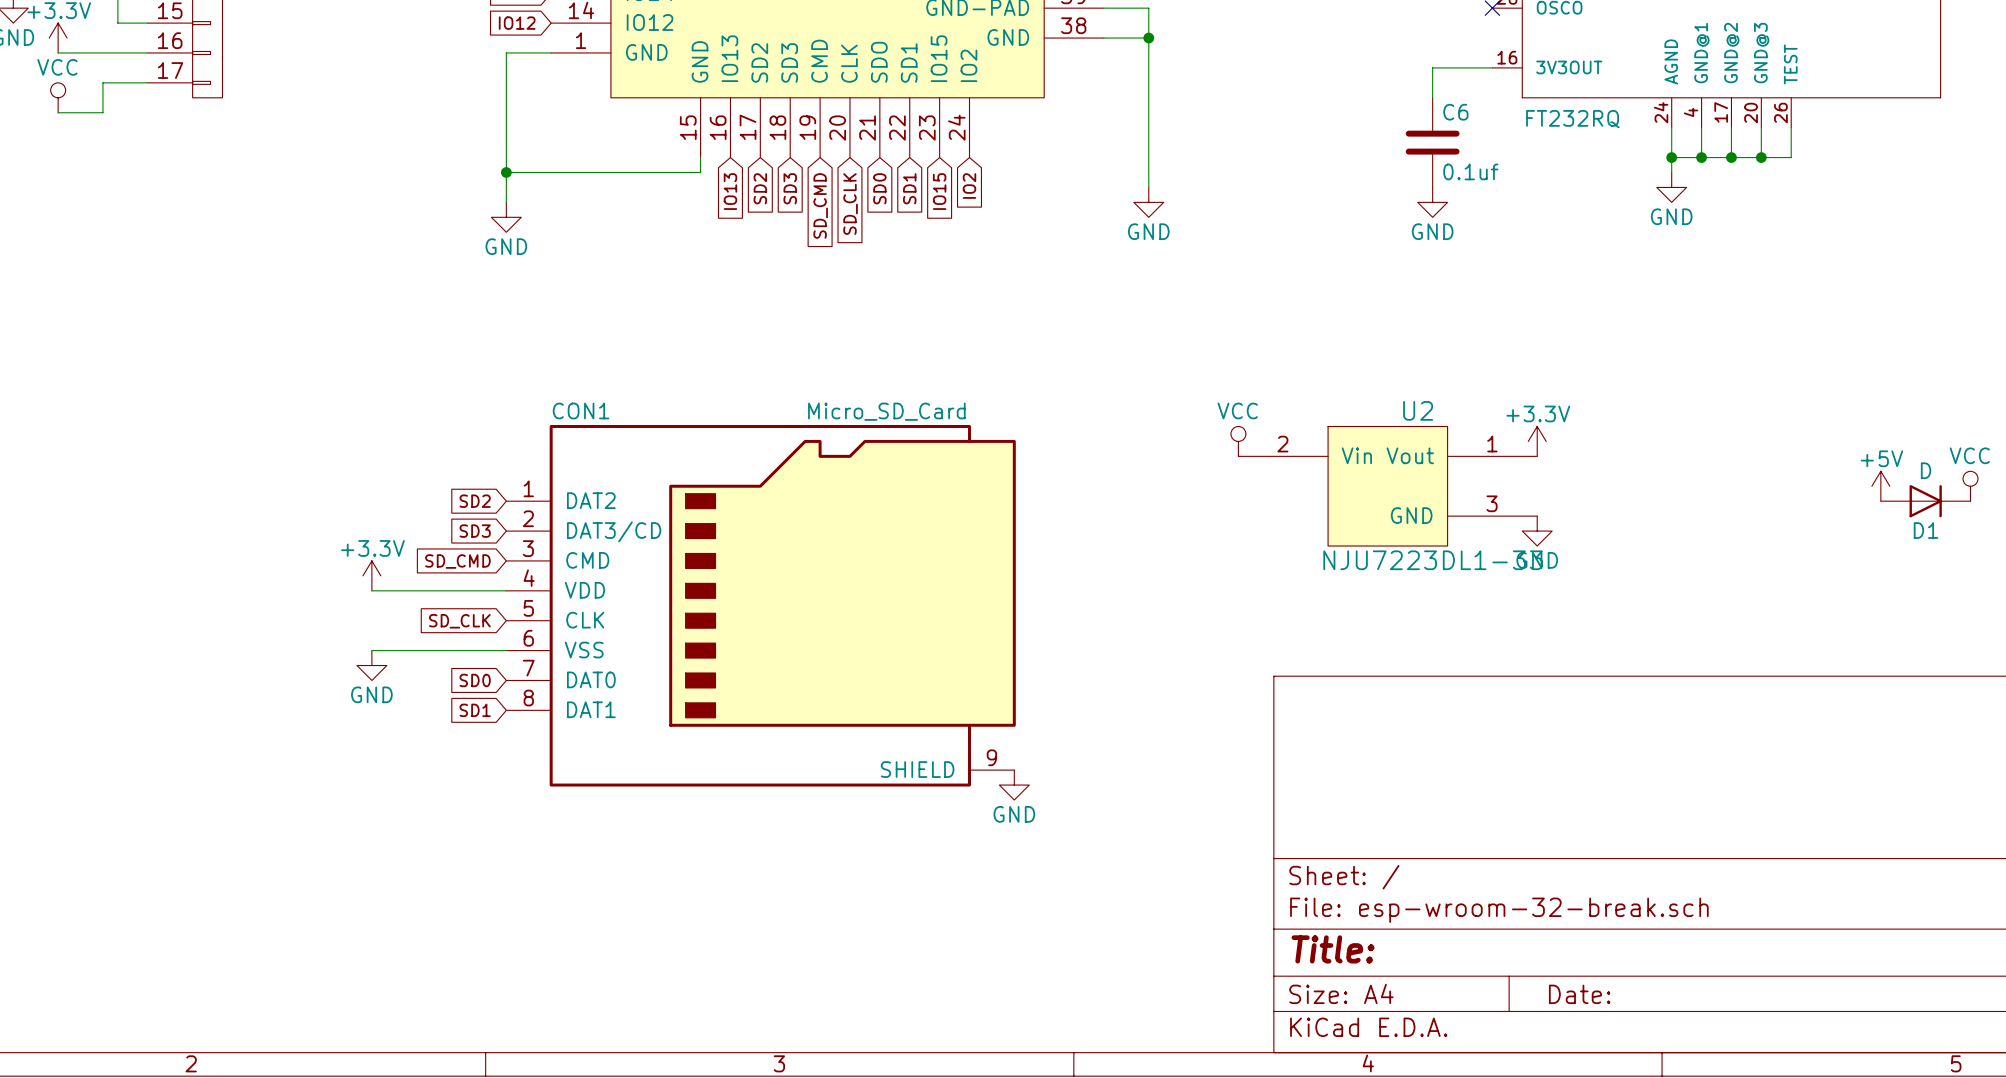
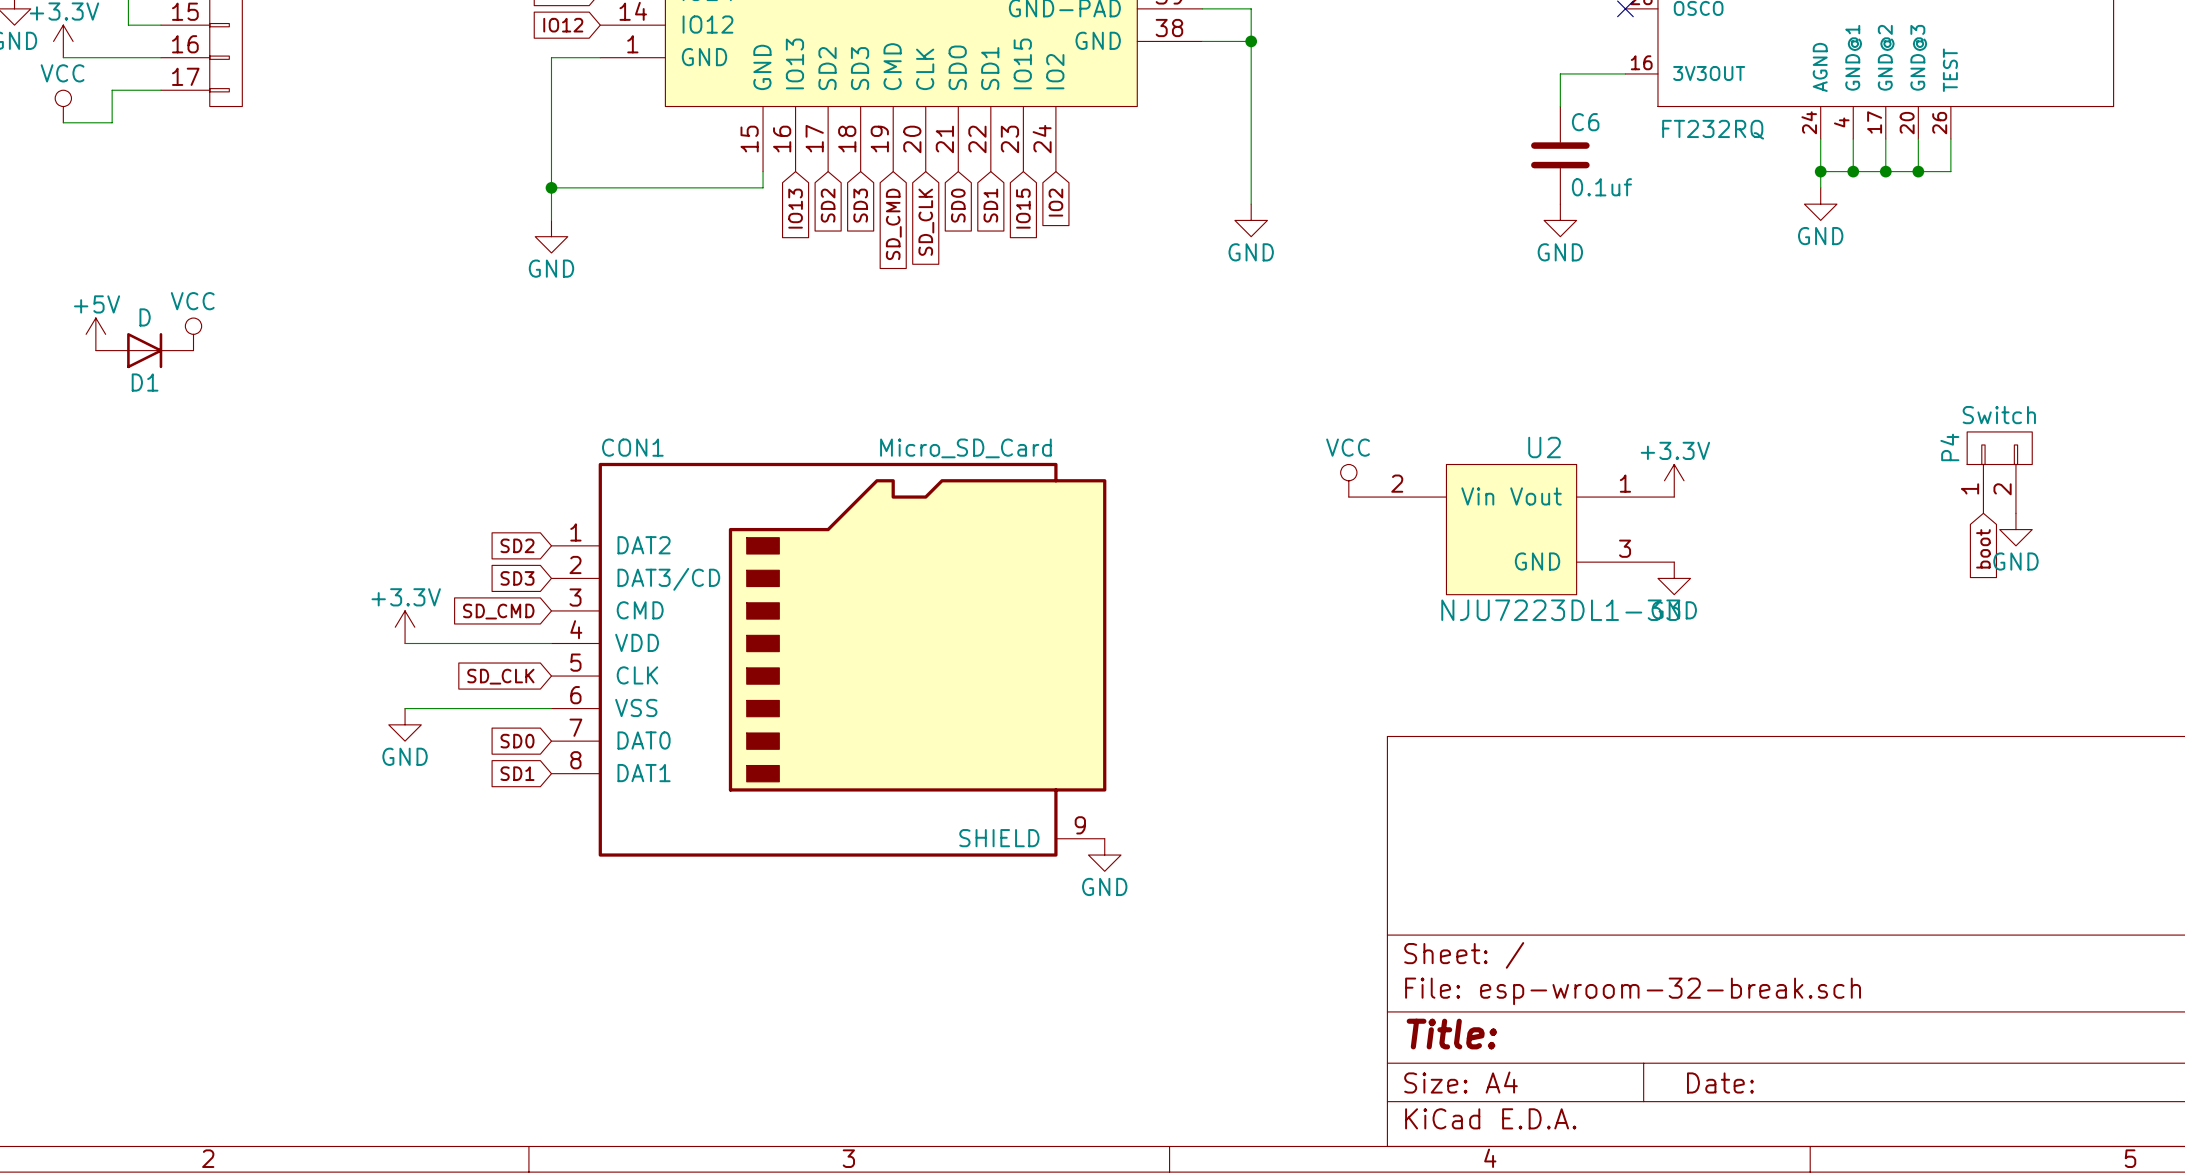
power symbol: none -> +5V (95, 334)
power symbol: none -> VCC (193, 334)
P4: none -> Switch (1999, 472)
power symbol: none -> GND (2015, 529)
power symbol: +5V (1880, 486) -> none
power symbol: VCC (1970, 486) -> none
D1 position: (1925, 501) -> (144, 350)
global label: none -> boot (1983, 548)

